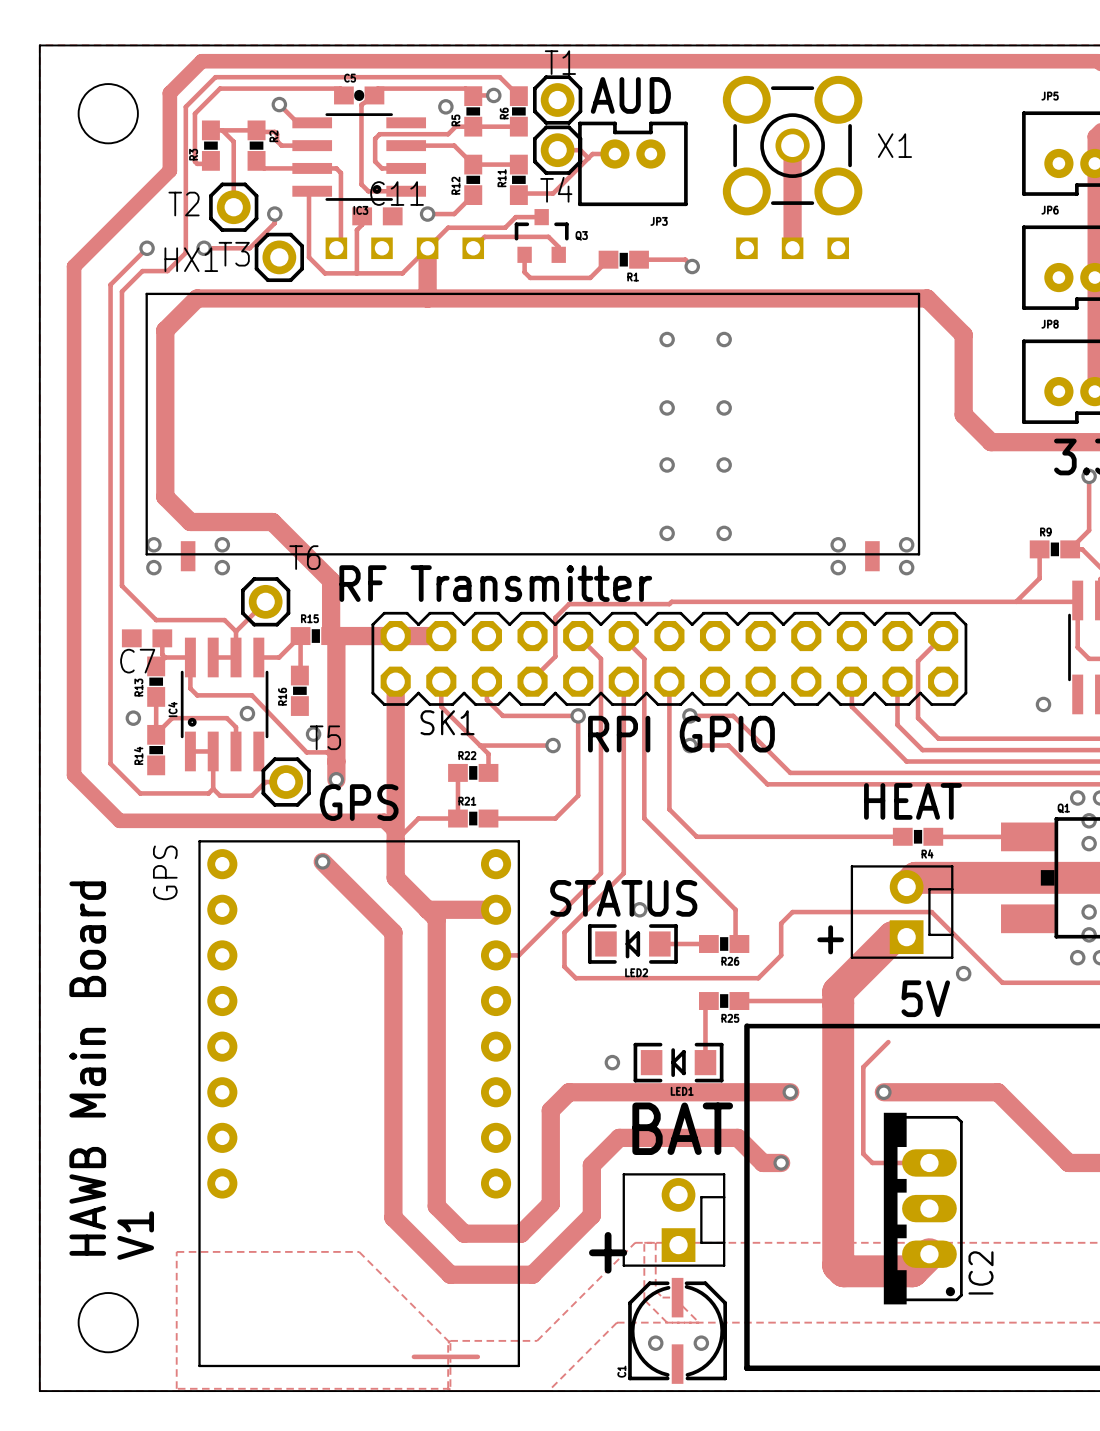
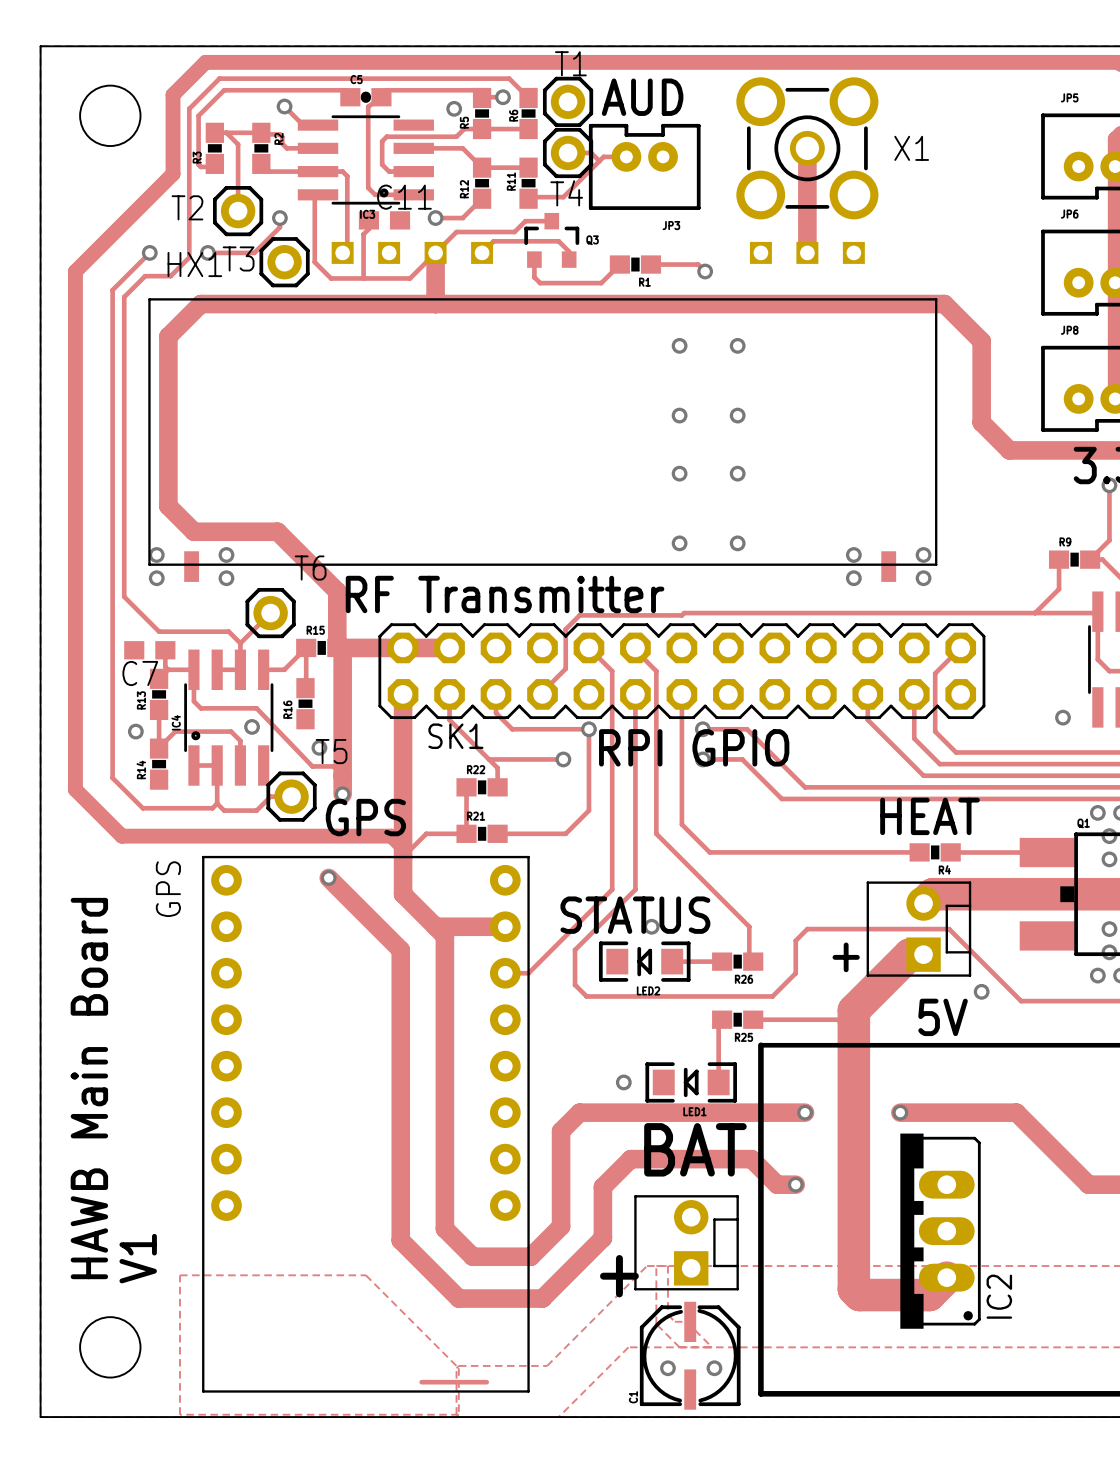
track: (888, 1042) (863, 1067) (863, 1153) (872, 1162) (929, 1162) -> none

